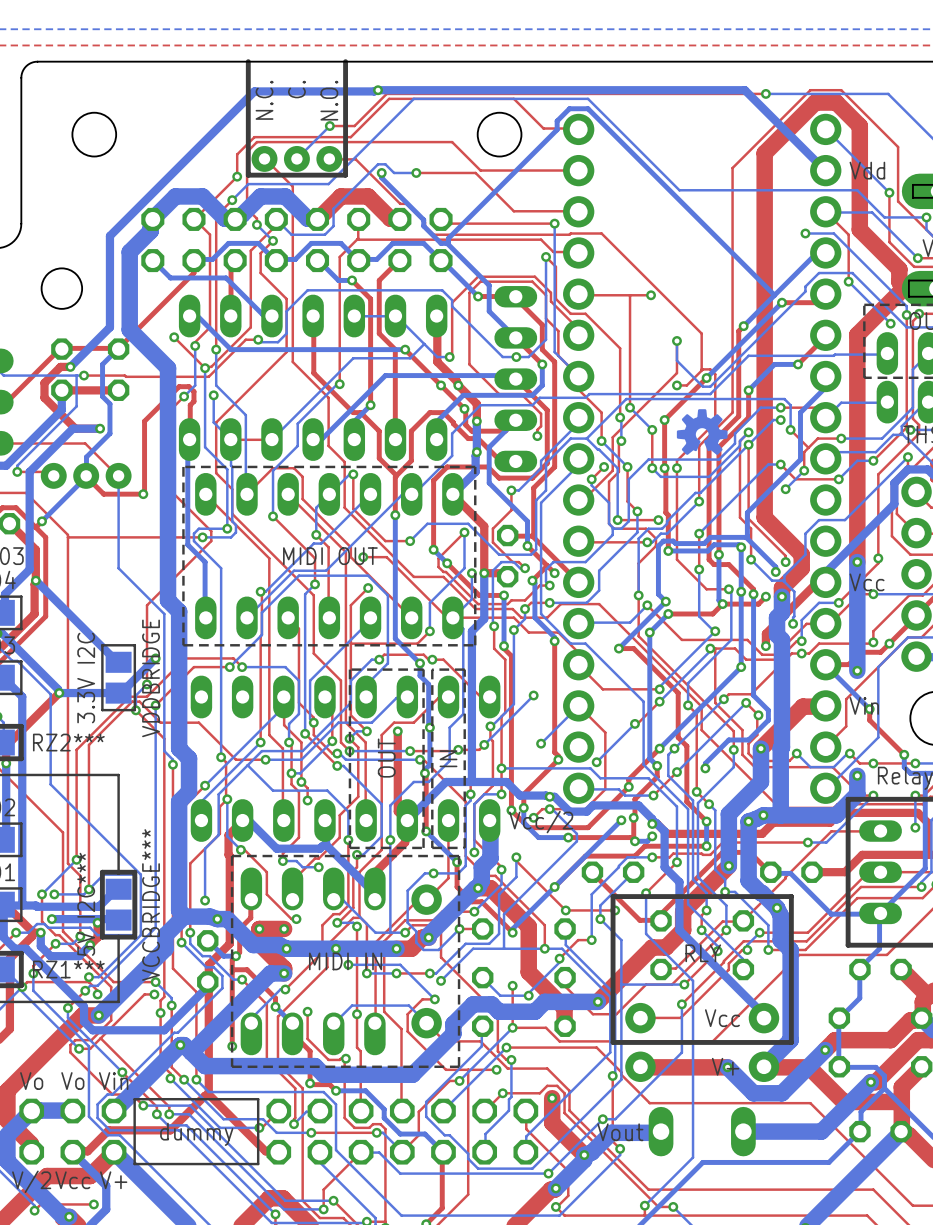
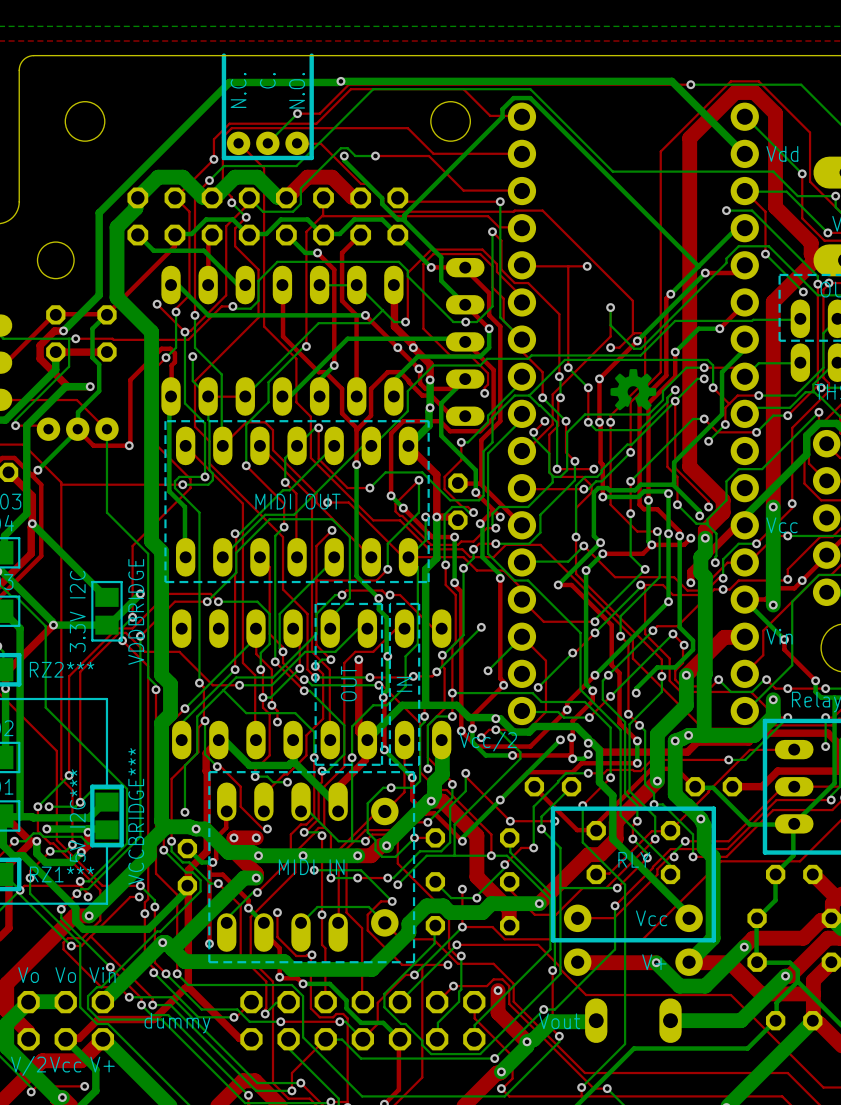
line: (258, 1099) (134, 1099) (134, 1164) (258, 1164) (258, 1099) -> none

